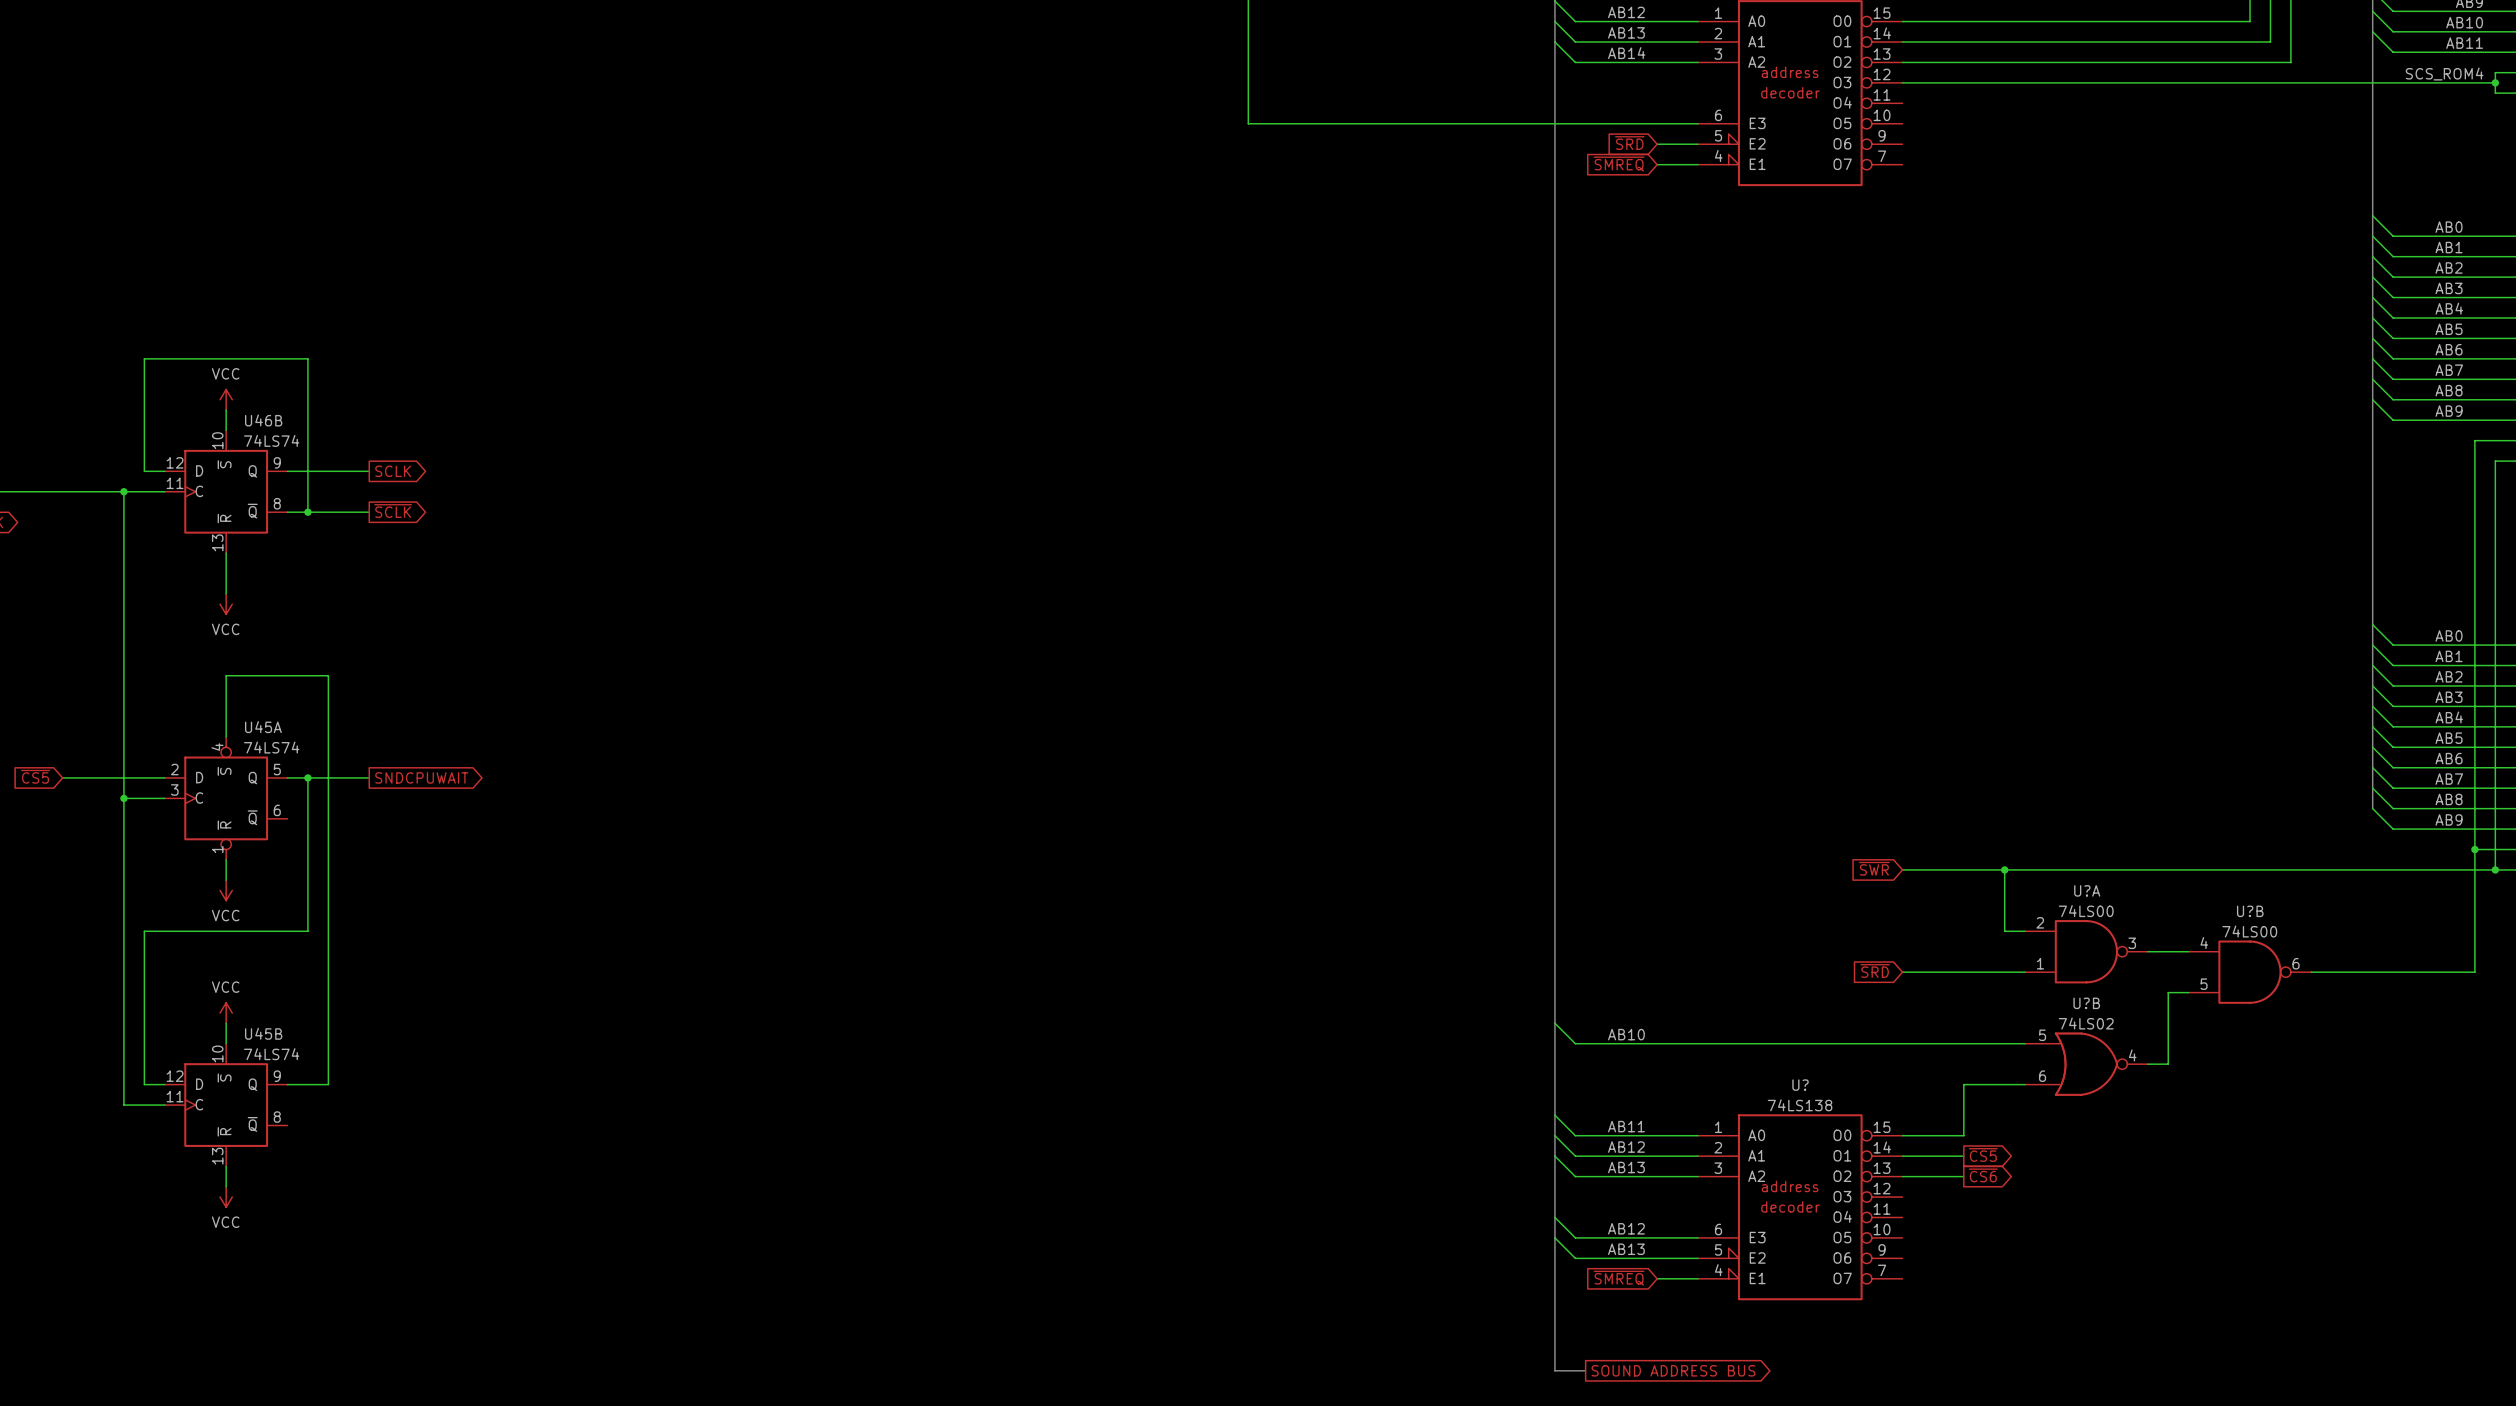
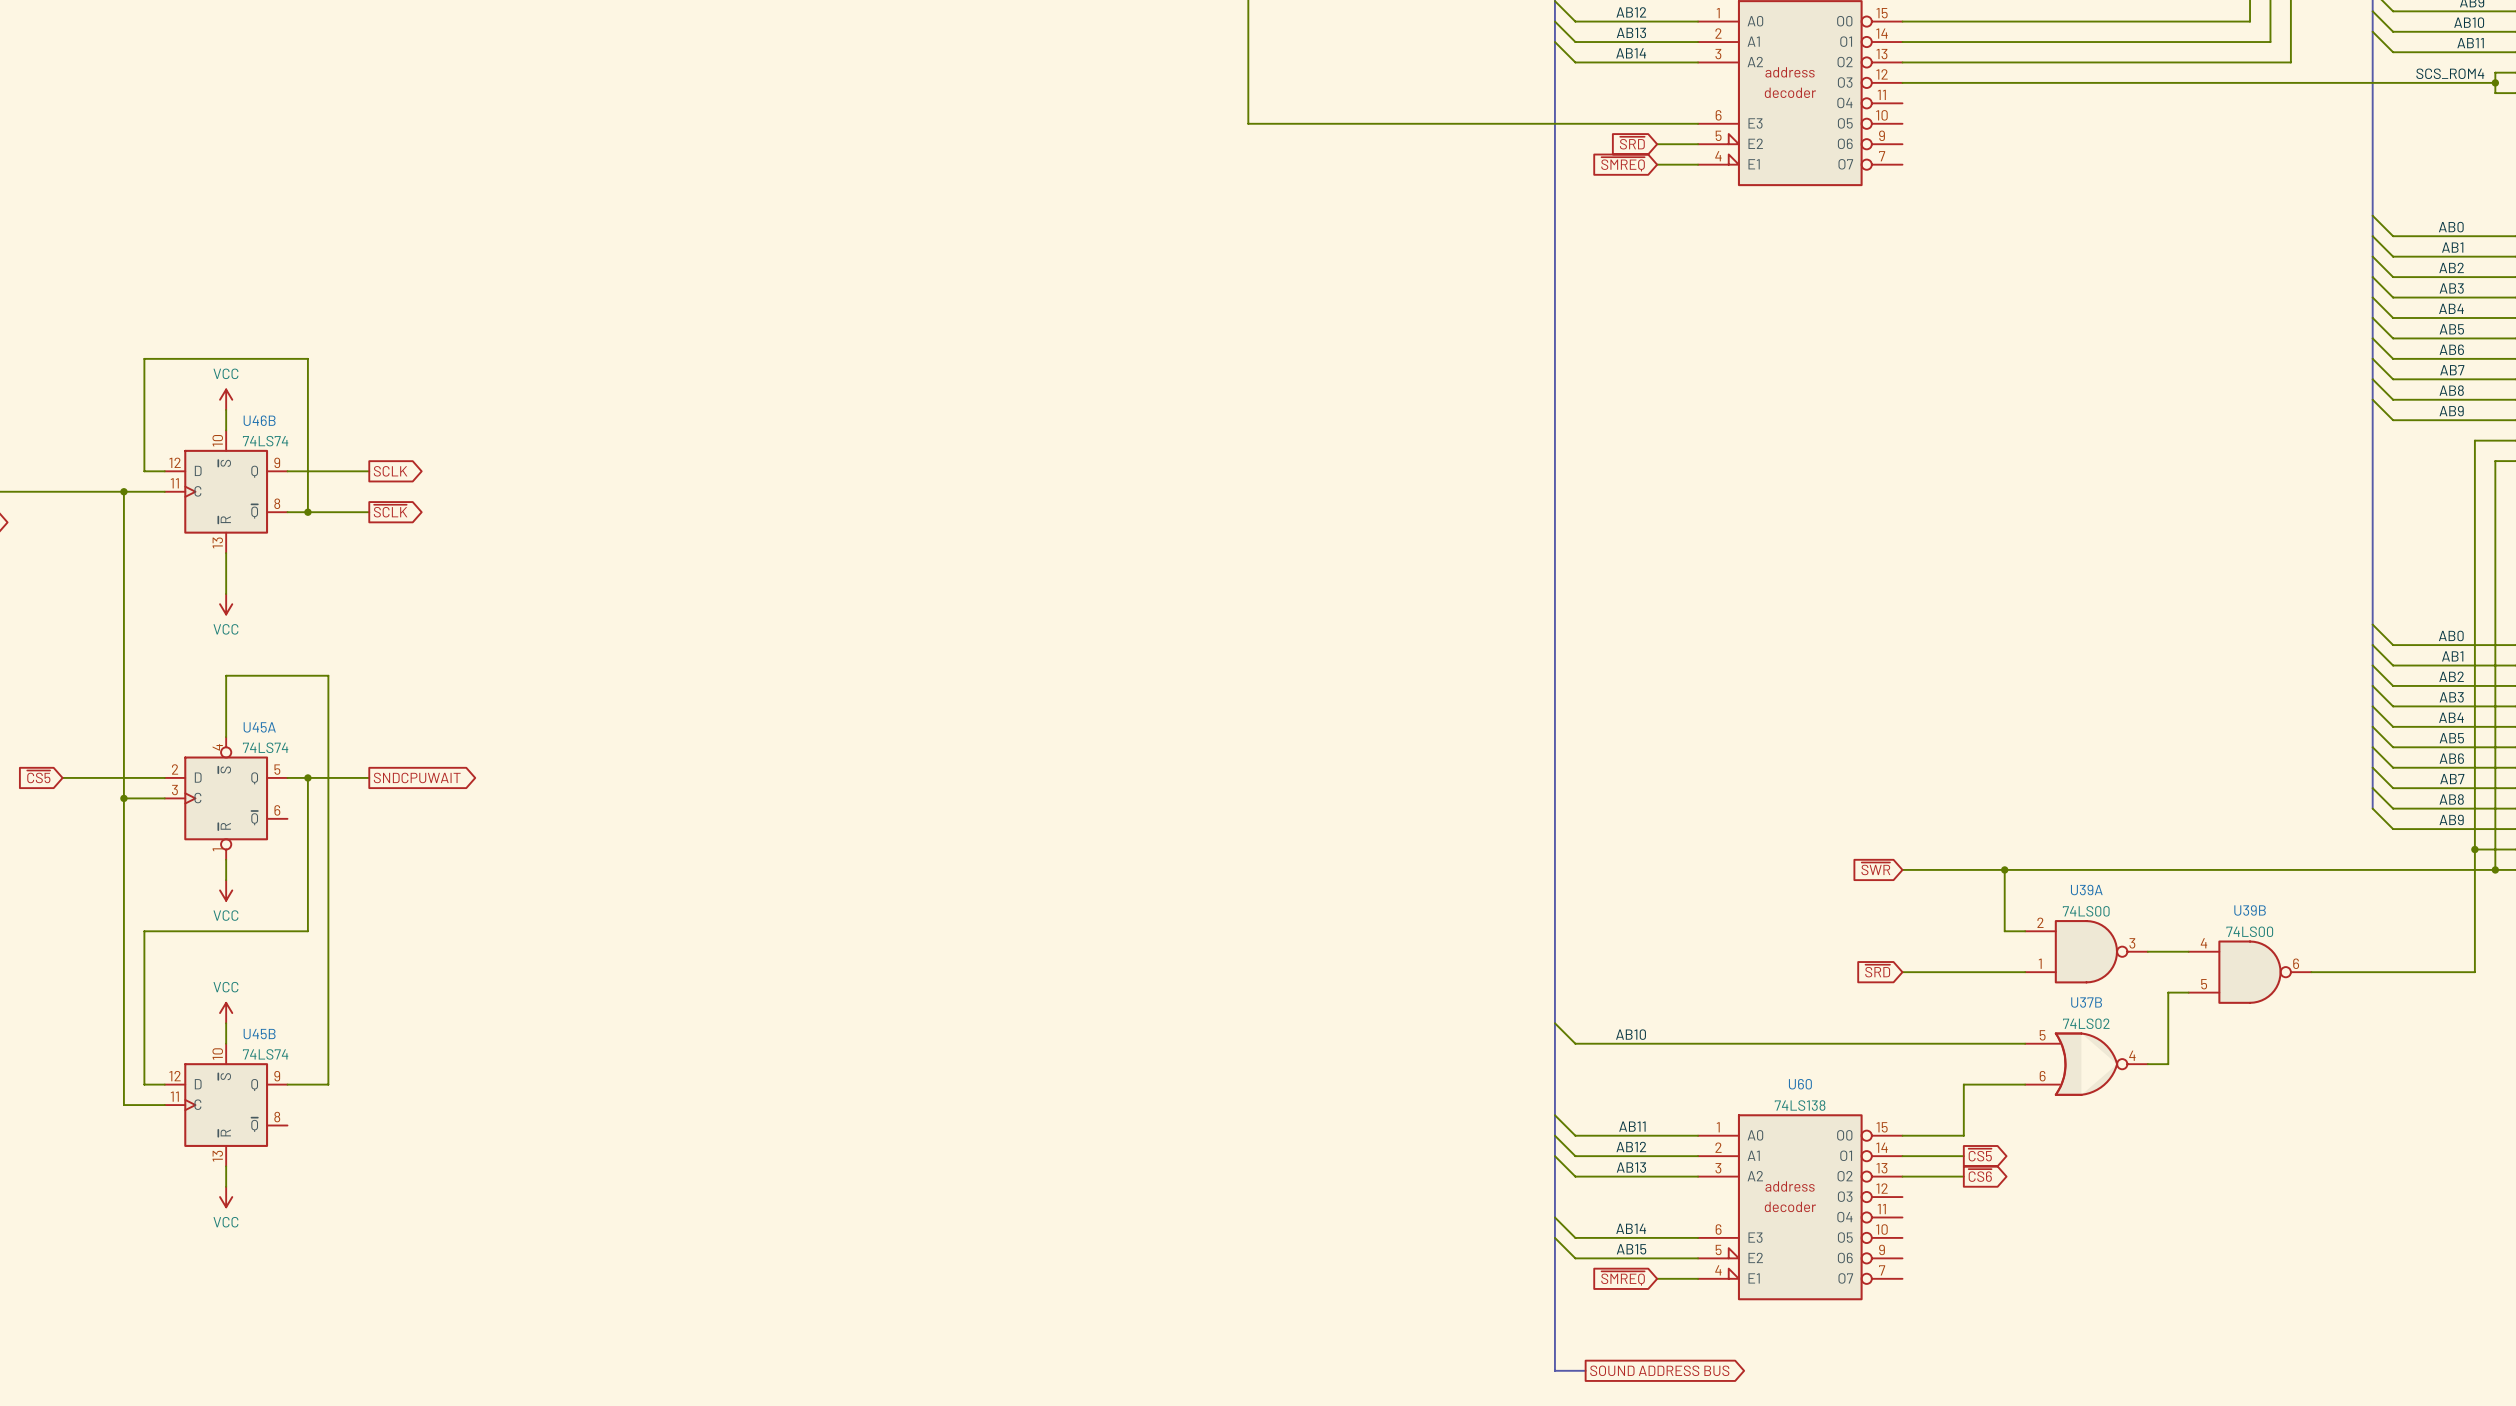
U?A name: U?A (2087, 890) -> U39A (2086, 890)
U?B name: U?B (2250, 911) -> U39B (2250, 910)
U?B name: U?B (2086, 1003) -> U37B (2086, 1002)
U? name: U? (1800, 1085) -> U60 (1800, 1084)
label: AB12 (1626, 1228) -> AB14 (1631, 1228)
label: AB13 (1626, 1249) -> AB15 (1631, 1249)

